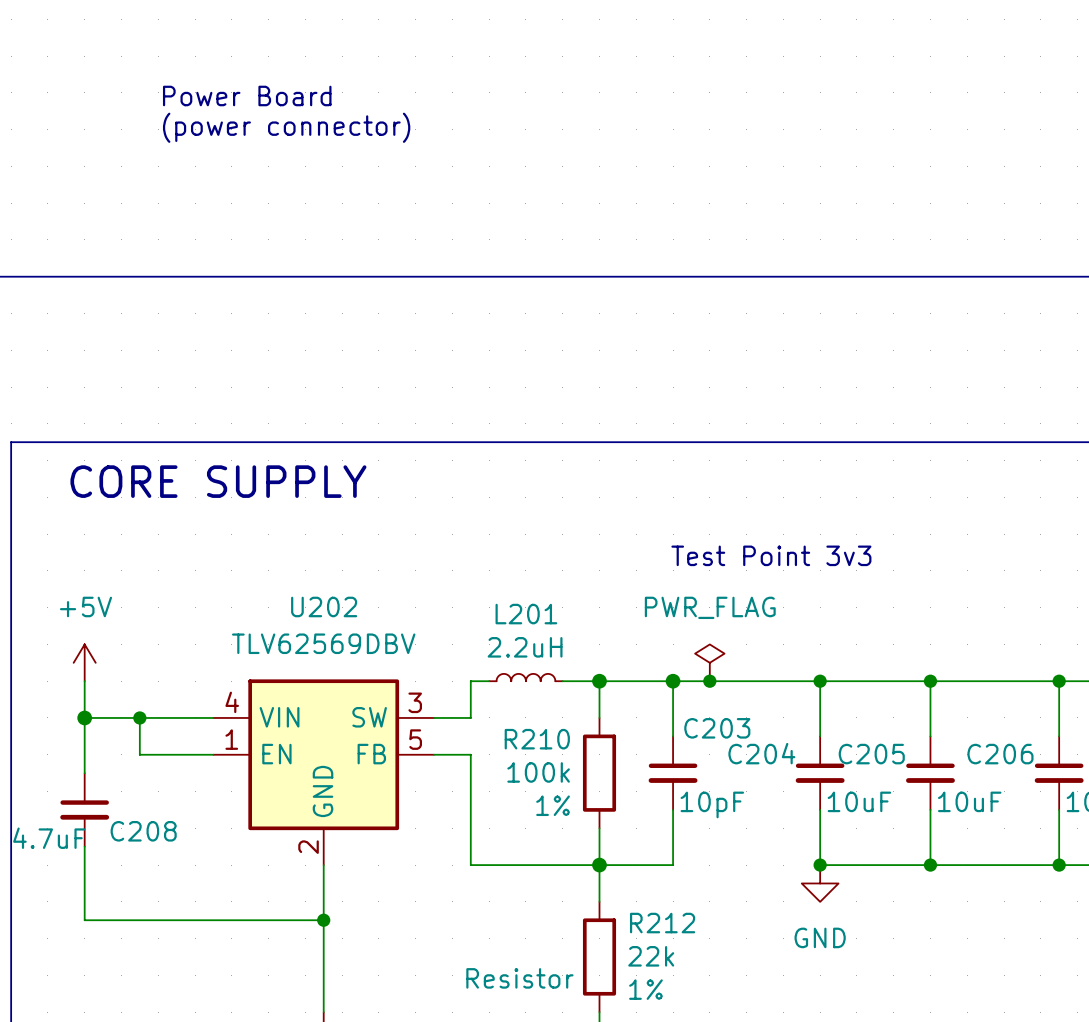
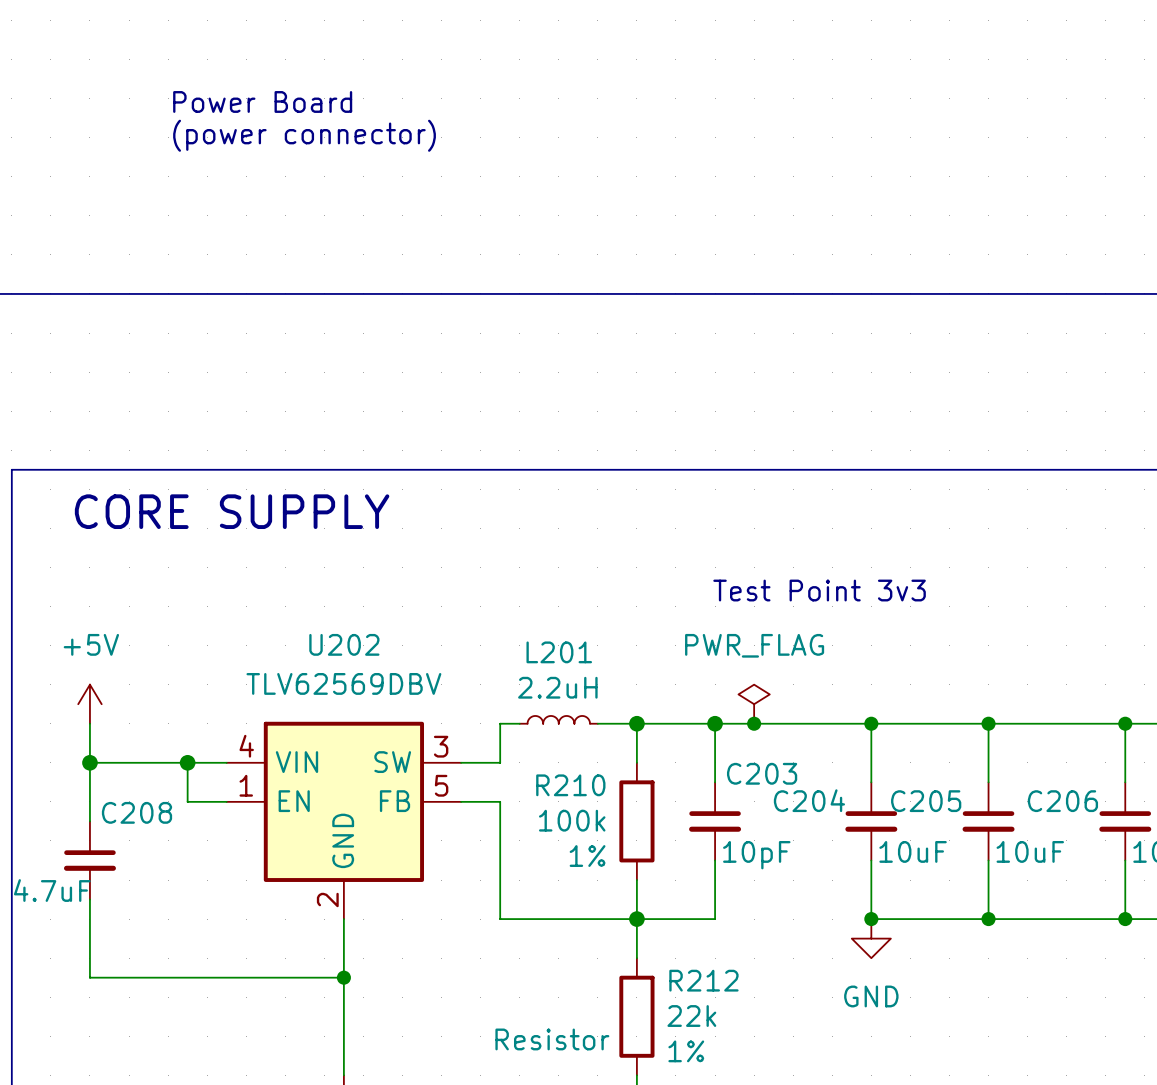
wire: (139, 717) (139, 754) (176, 754) -> (187, 762) (187, 801)
junction: (139, 717) -> none
junction: none -> (187, 762)
C208 name position: C208 (143, 831) -> C208 (136, 812)

